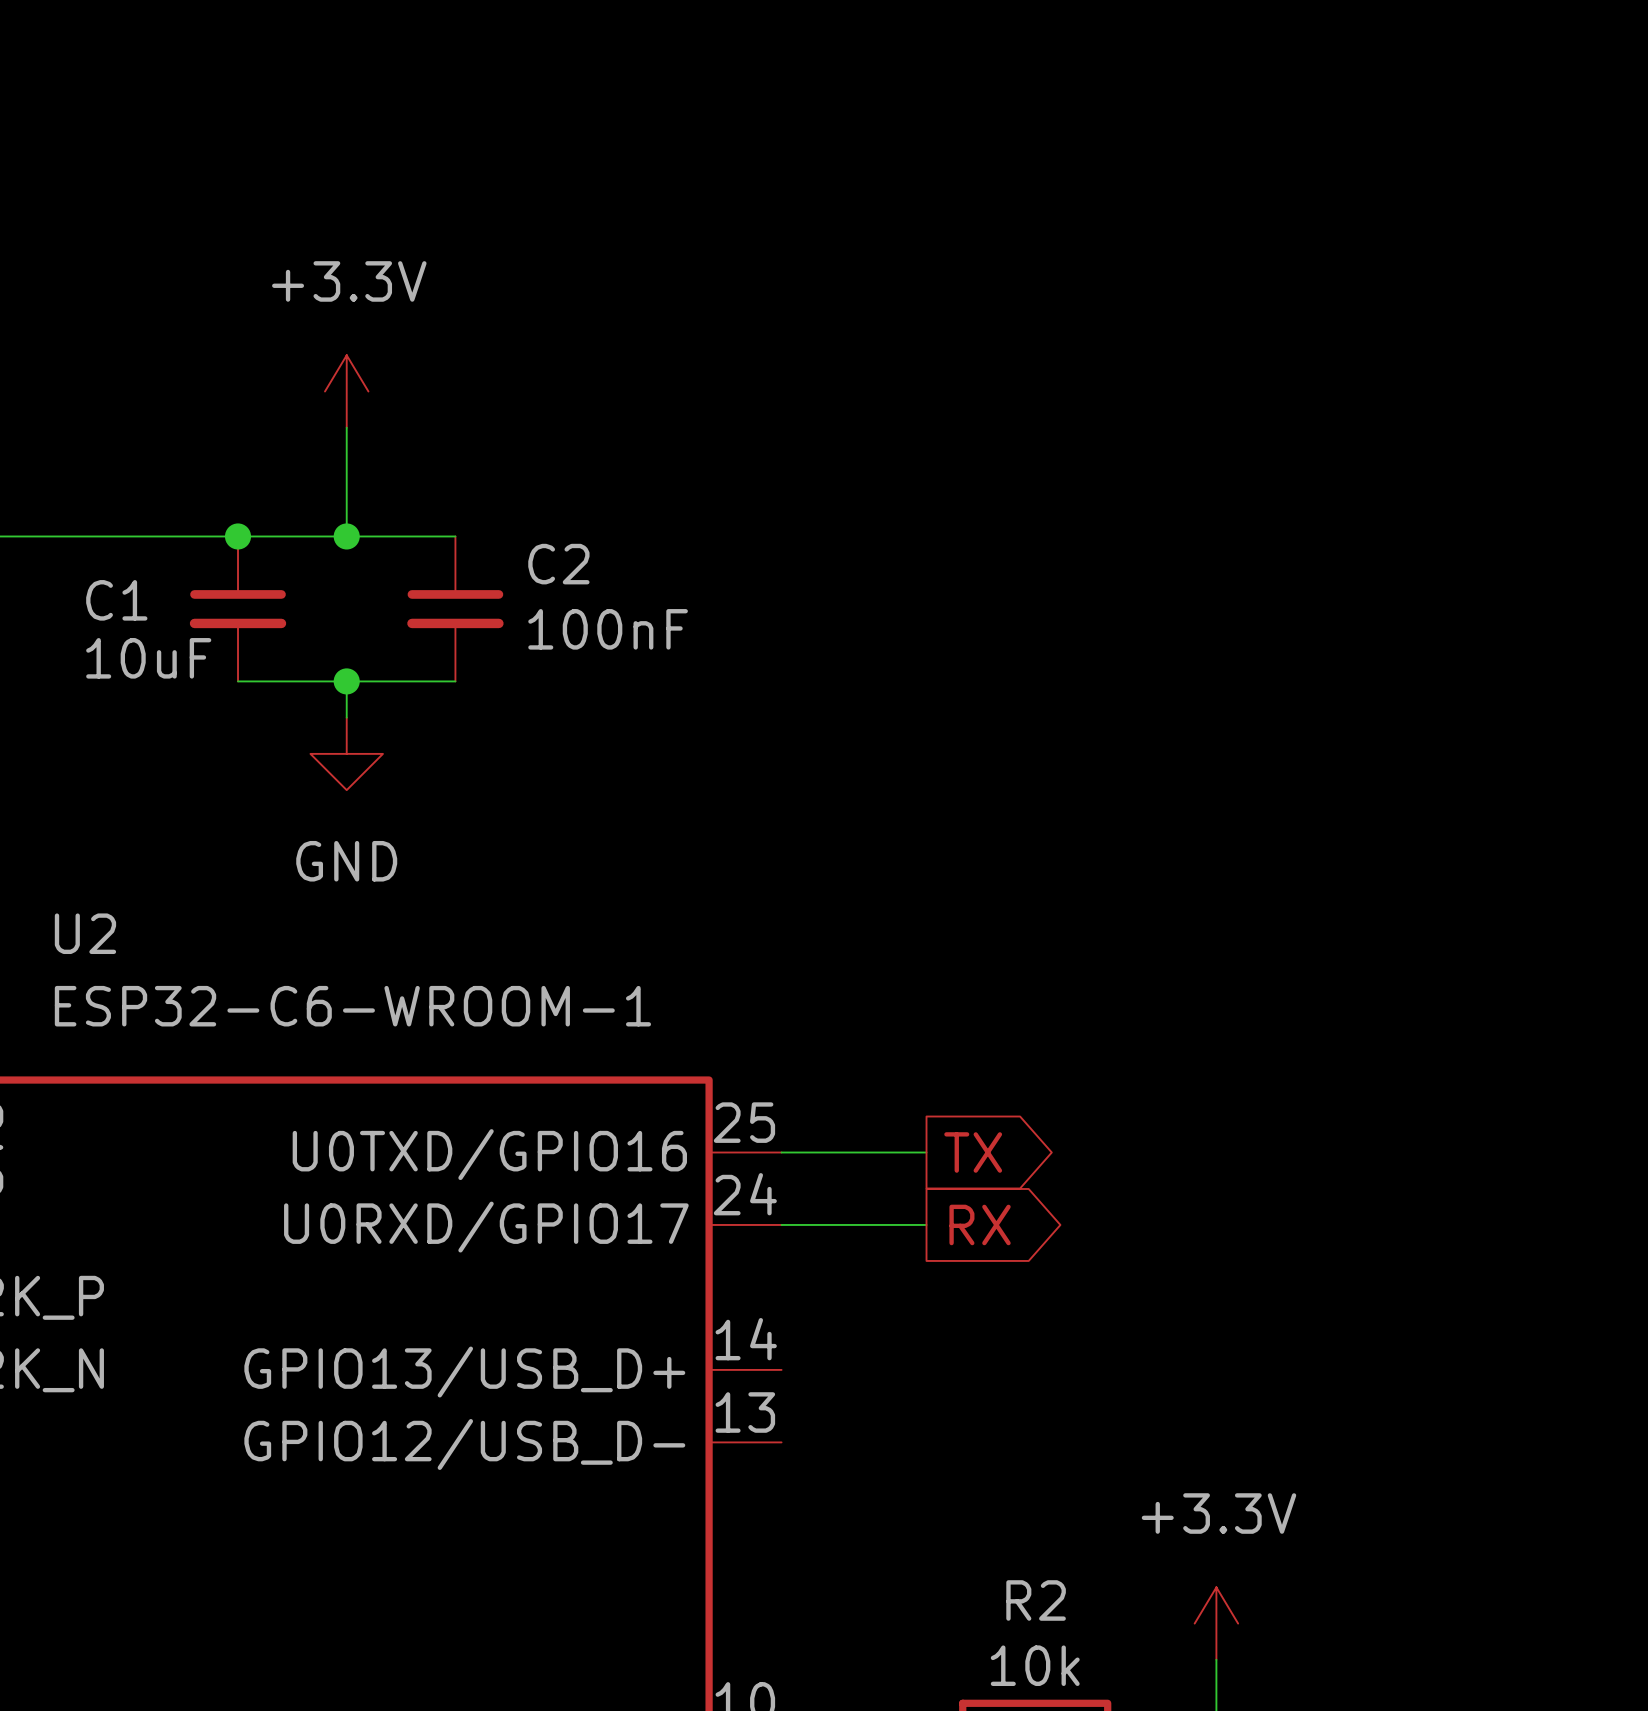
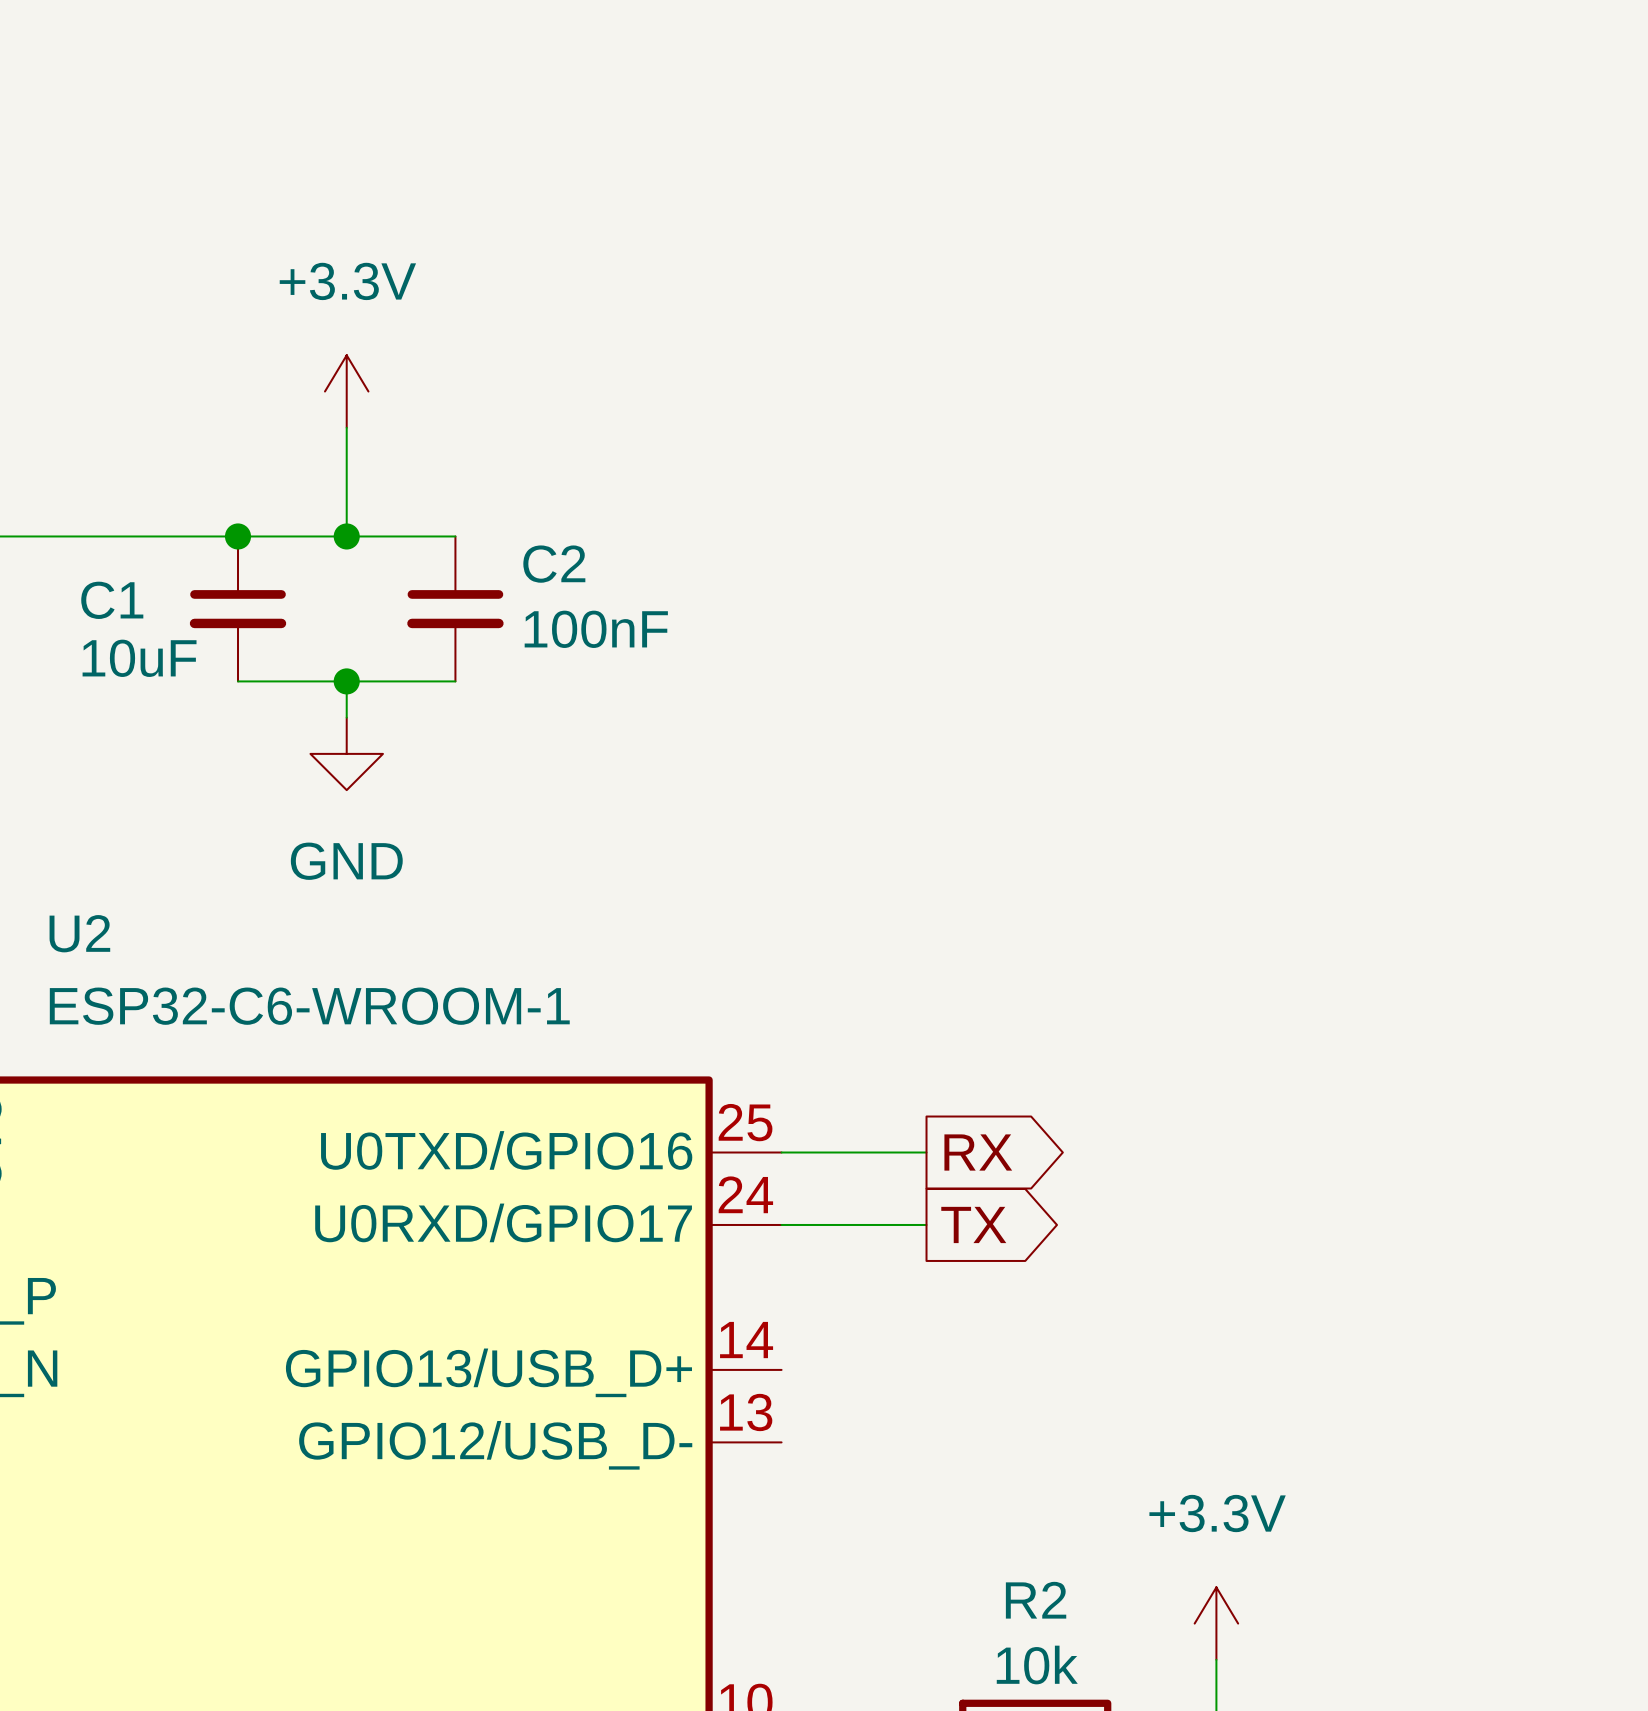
global label: TX (973, 1152) -> RX (978, 1152)
global label: RX (980, 1224) -> TX (973, 1224)

